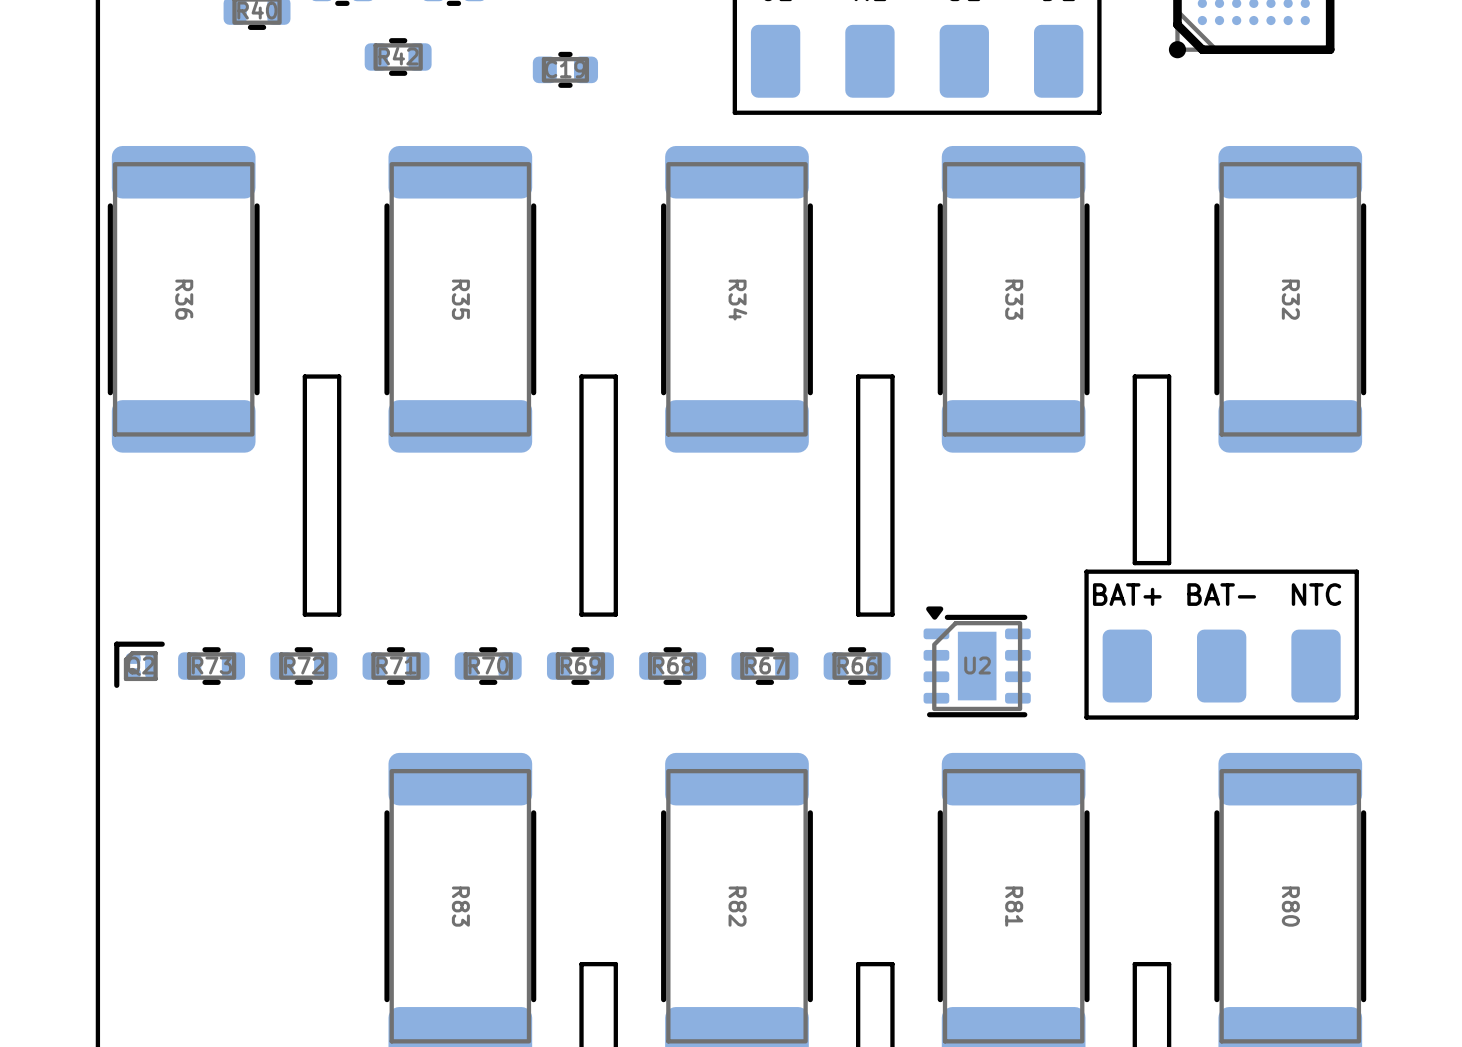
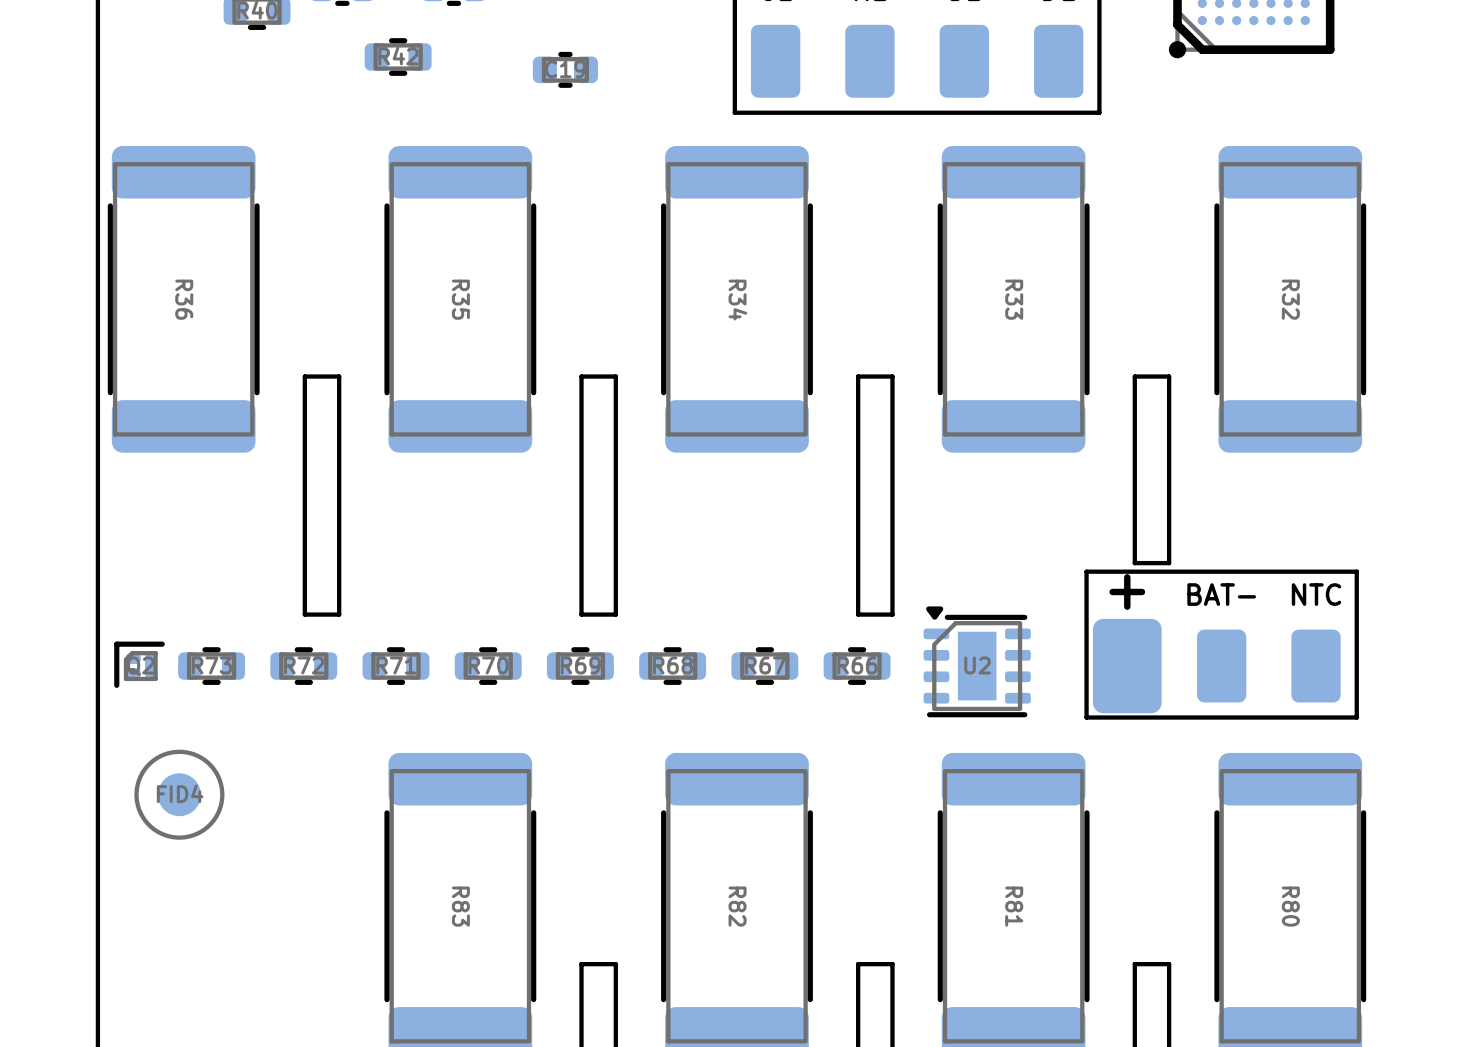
part footprint: [1084, 569, 1359, 720] -> [1084, 569, 1359, 720]
FID4: none -> (179, 794)

